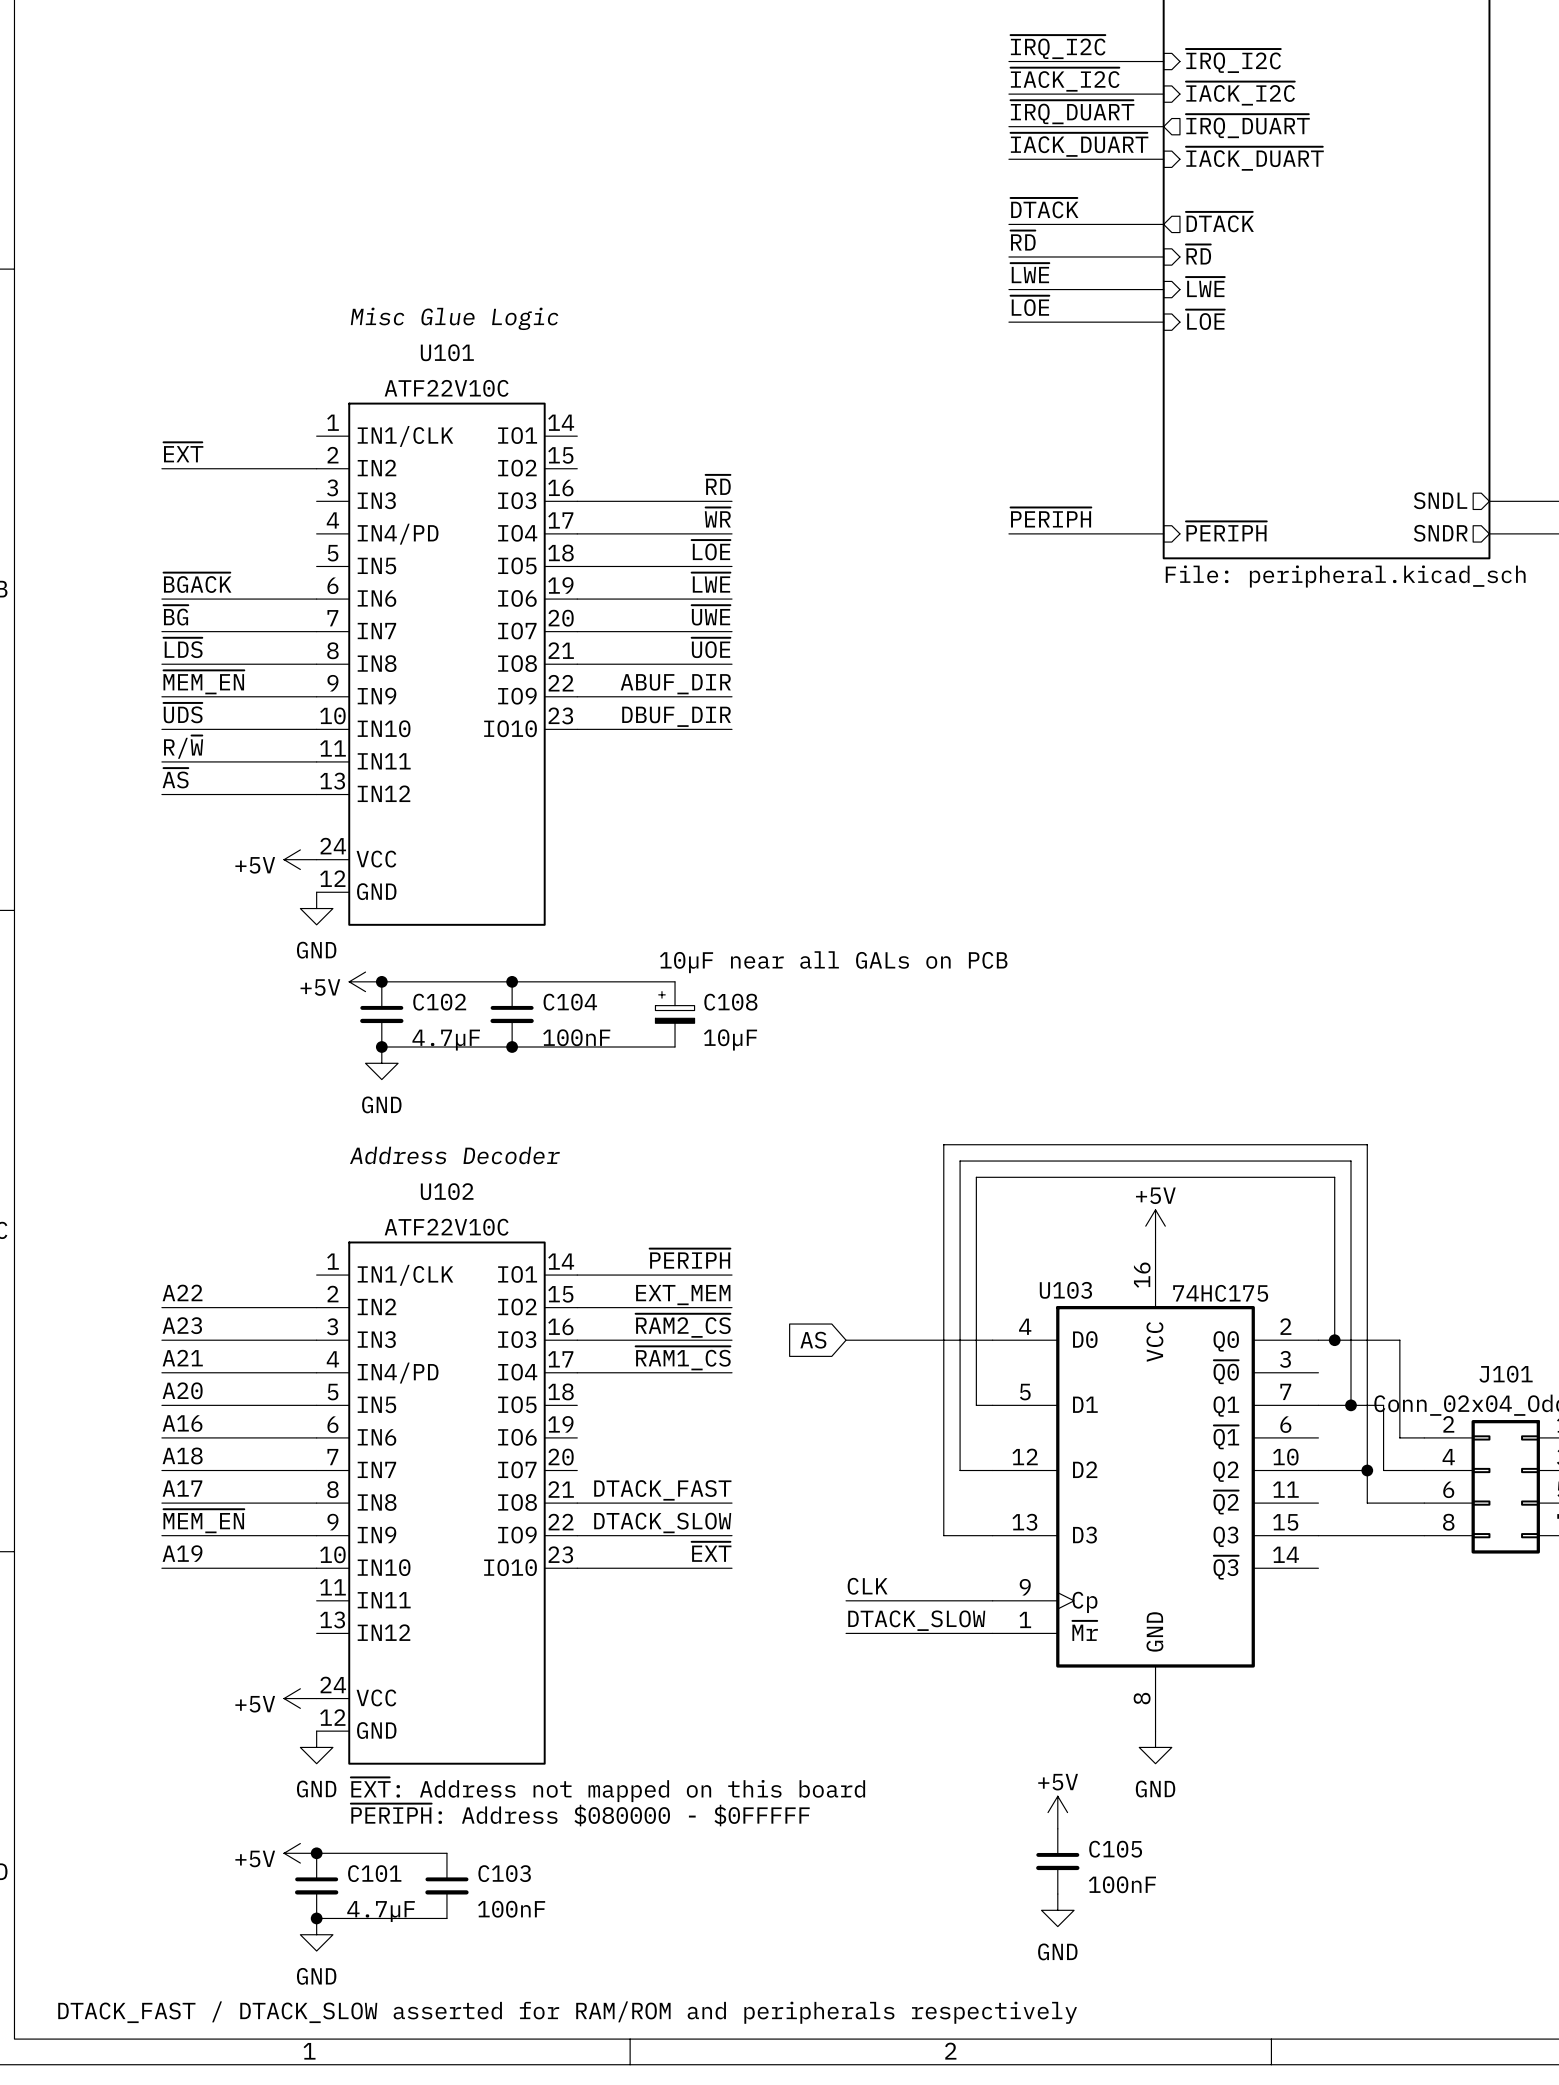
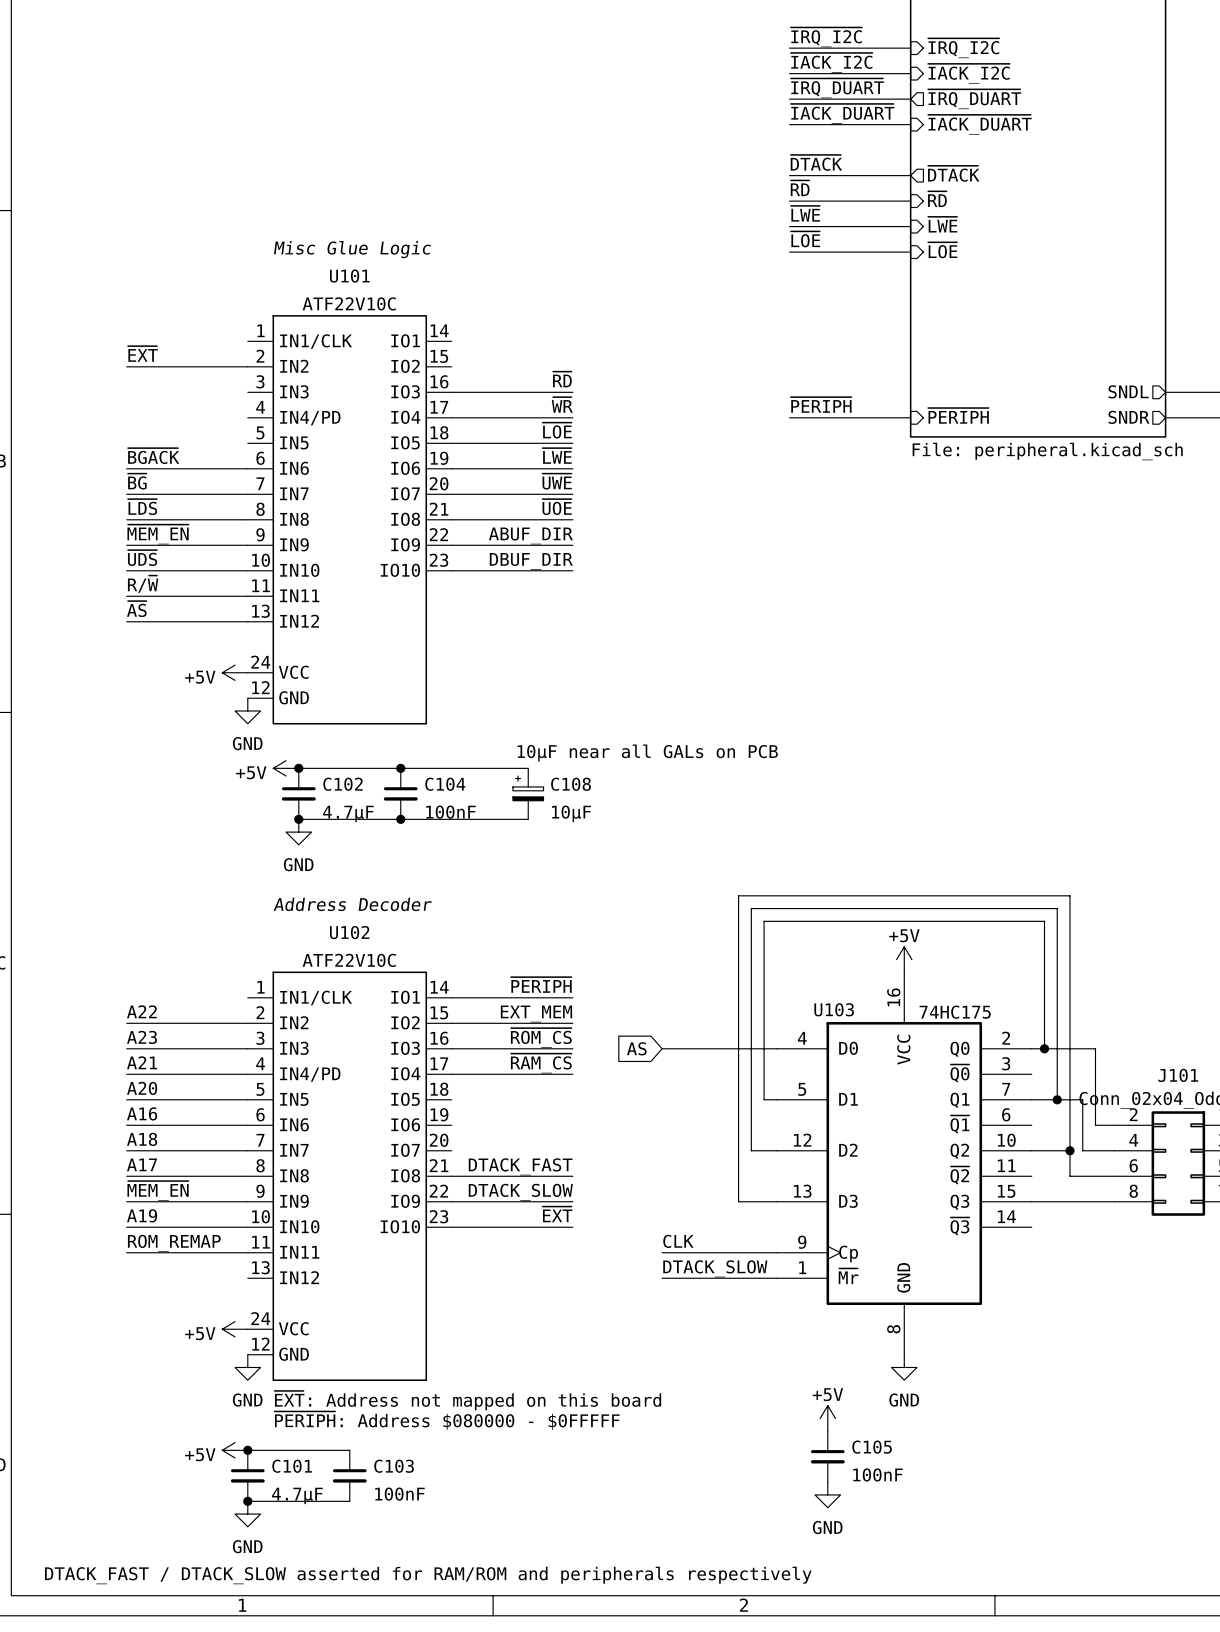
label: ~{RAM2_CS} (683, 1325) -> ~{ROM_CS} (541, 1038)
label: ~{RAM1_CS} (683, 1358) -> ~{RAM_CS} (541, 1063)
label: none -> ROM_REMAP (174, 1243)
wire: none -> (126, 1252) (247, 1252)

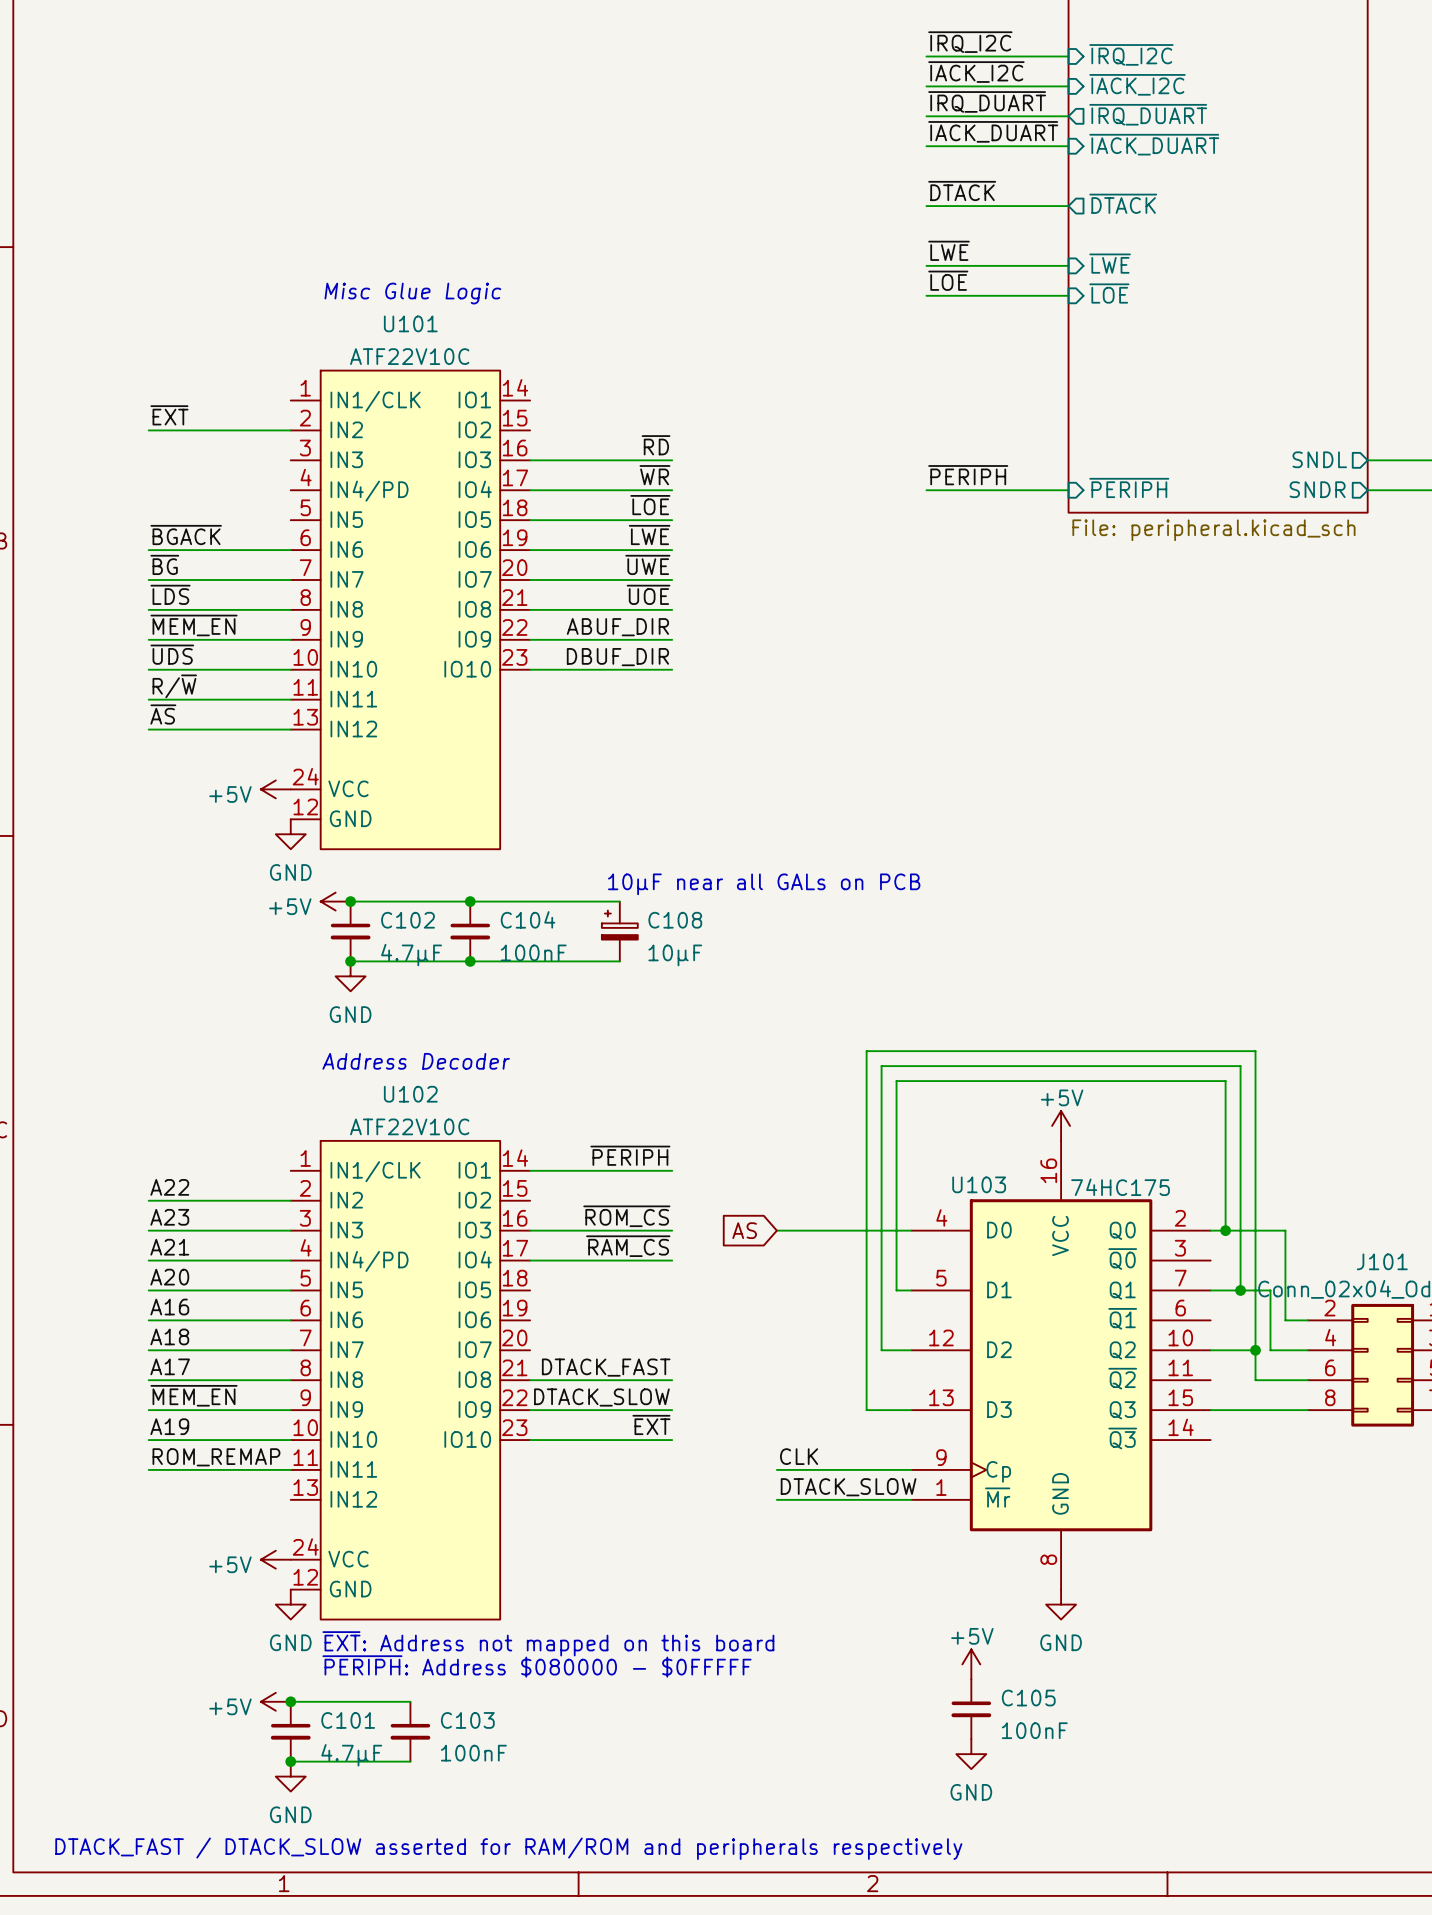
label: ~{RD} (800, 188) -> none
sheet pin: ~{RD} (937, 199) -> none
wire: (789, 201) (910, 201) -> none
label: EXT_MEM (536, 1013) -> none
wire: (451, 1023) (572, 1023) -> none

